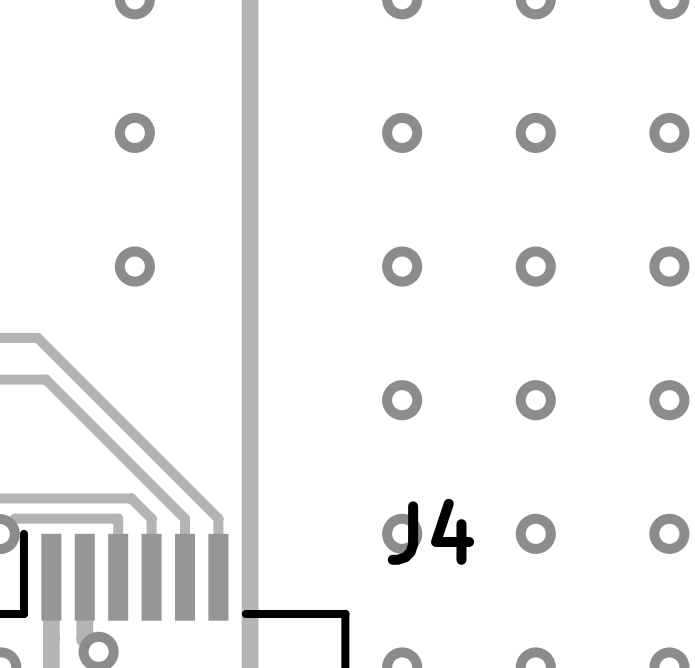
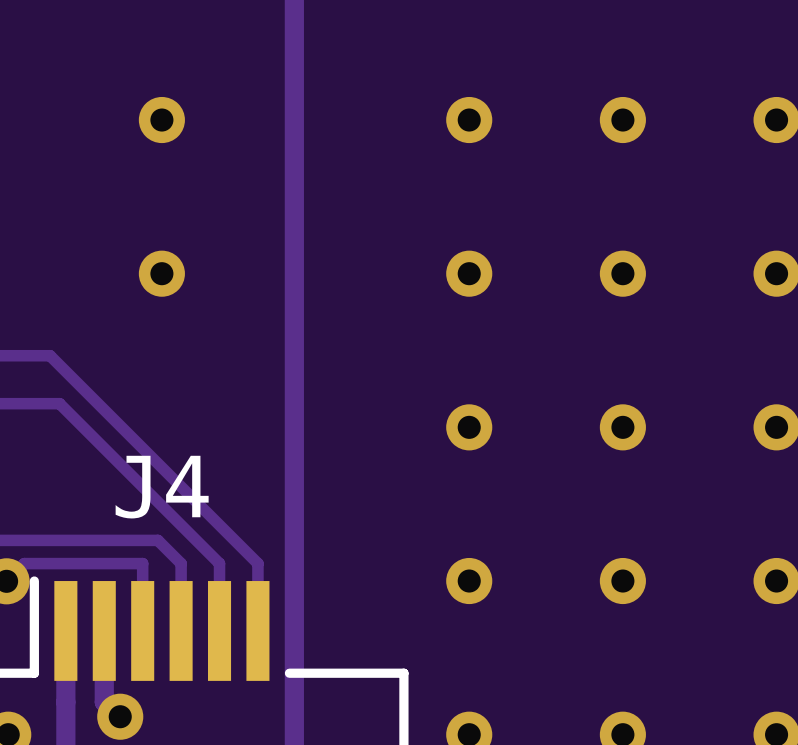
J4 name position: J4 (430, 531) -> J4 (162, 487)

